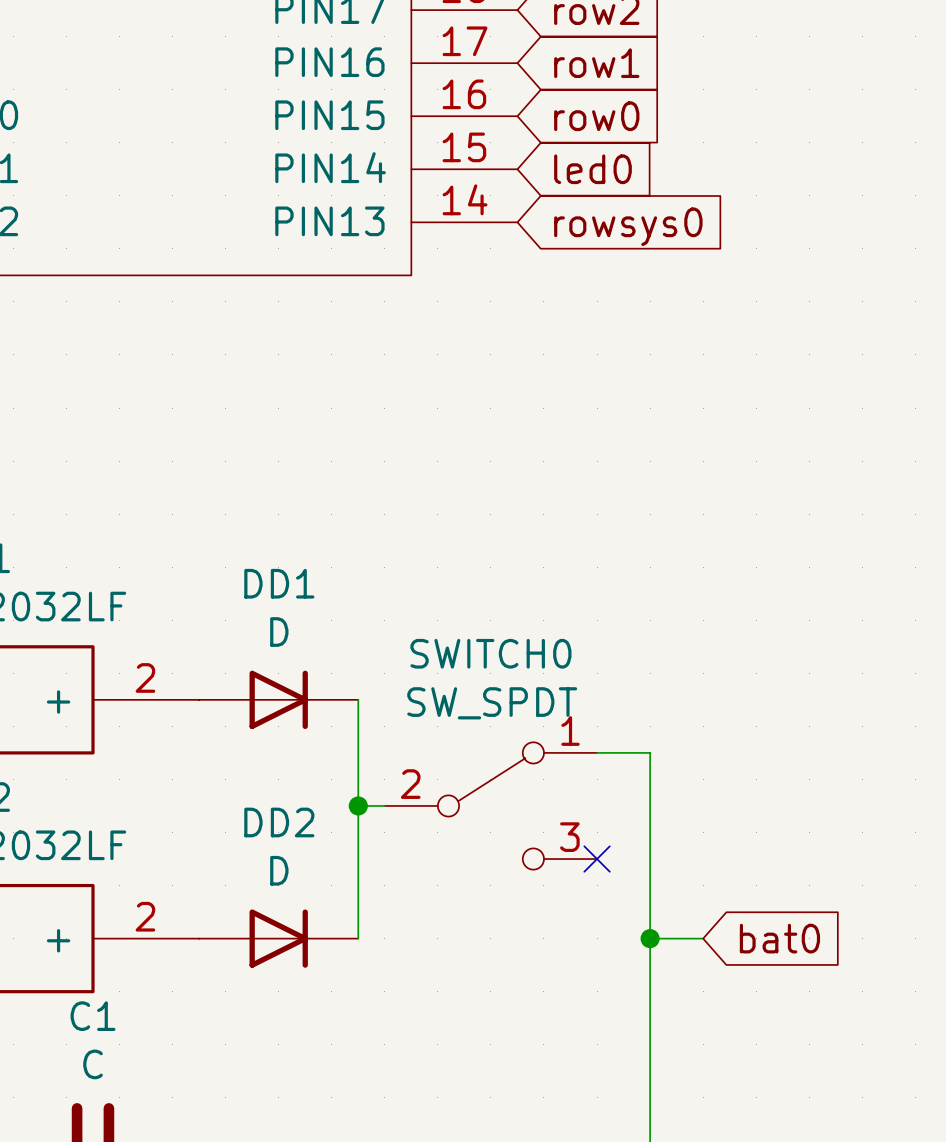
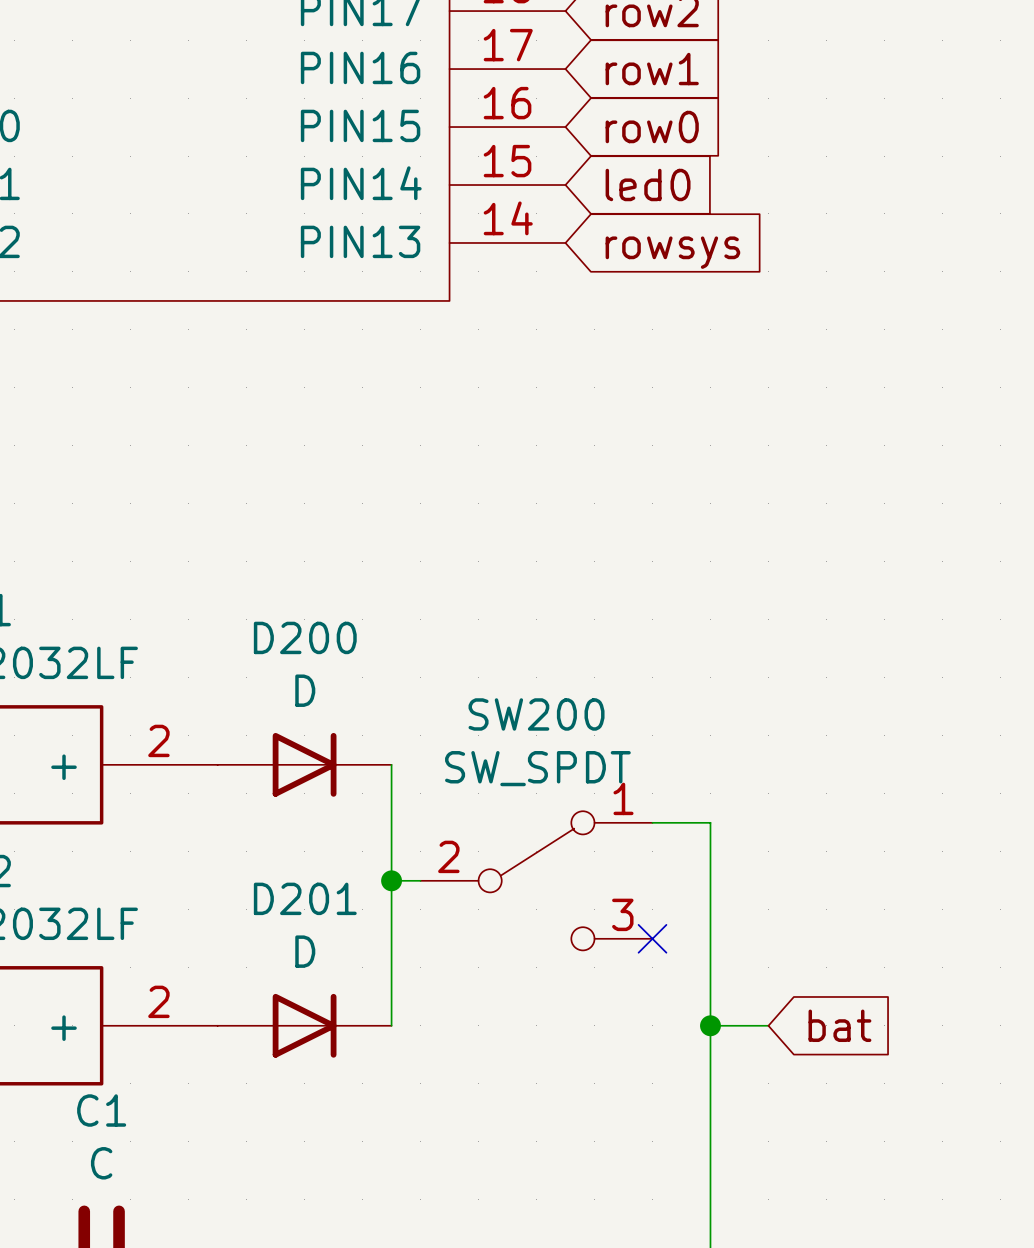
global label: rowsys0 (628, 226) -> rowsys (672, 252)
DD1 name: DD1 (279, 583) -> D200 (305, 637)
SWITCH0 name: SWITCH0 (490, 653) -> SW200 (536, 714)
DD2 name: DD2 (279, 822) -> D201 (305, 898)
global label: bat0 (779, 938) -> bat (839, 1025)

